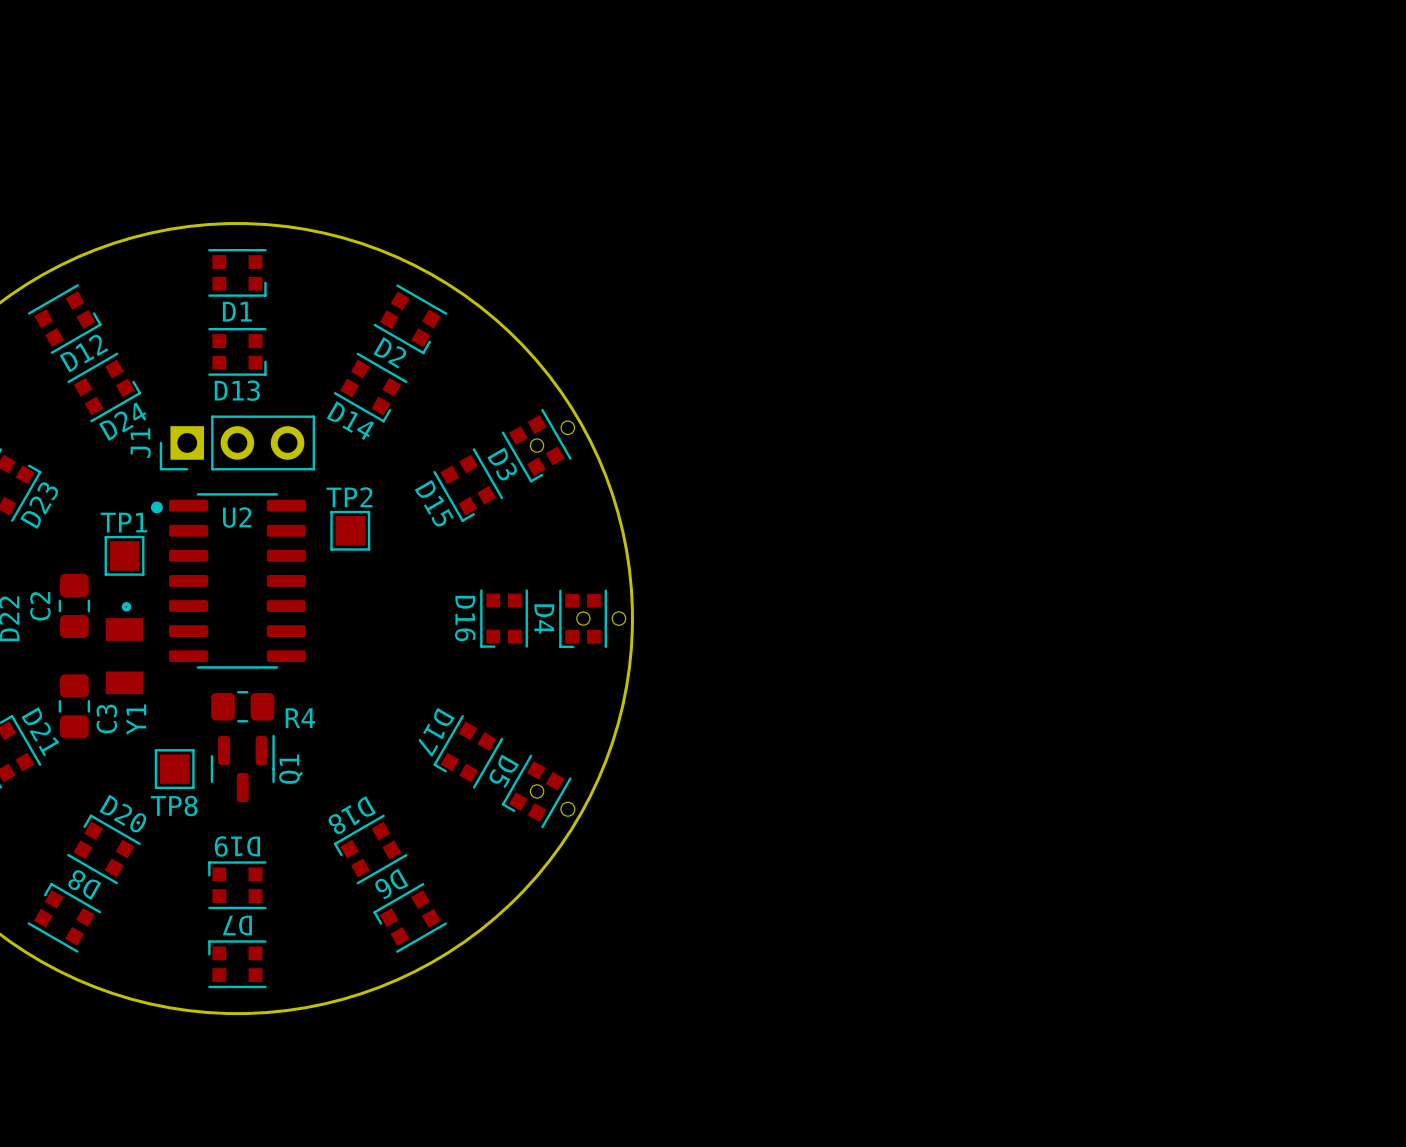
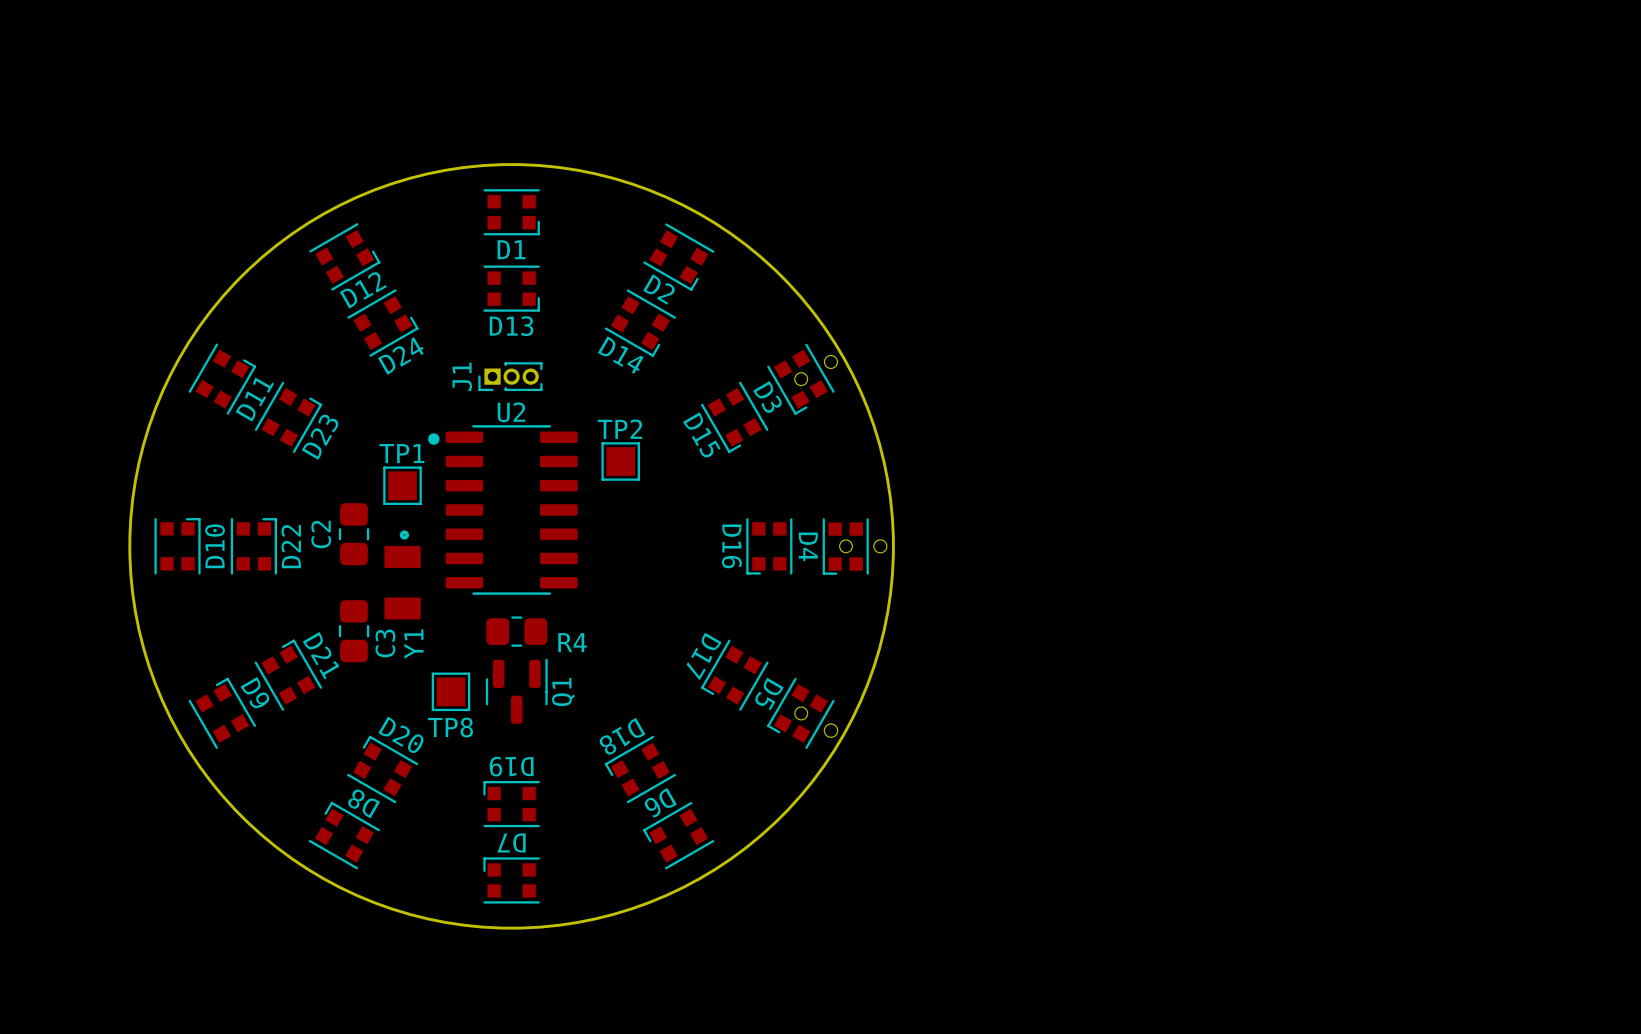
J1 footprint: [159, 415, 316, 471] -> [478, 362, 543, 392]
J1 name position: J1 (140, 443) -> J1 (462, 376)
U2 name position: U2 (237, 517) -> U2 (511, 412)

